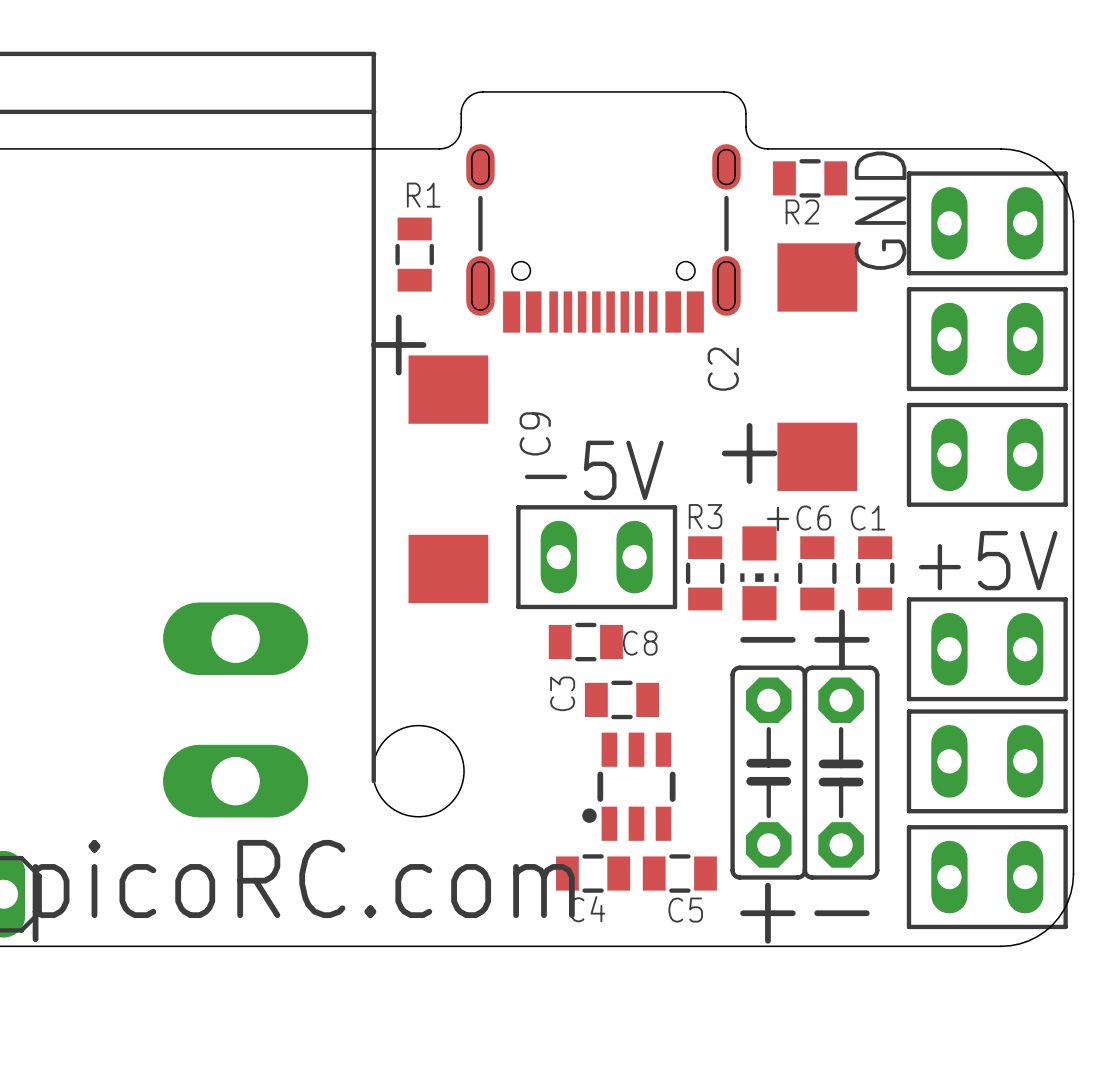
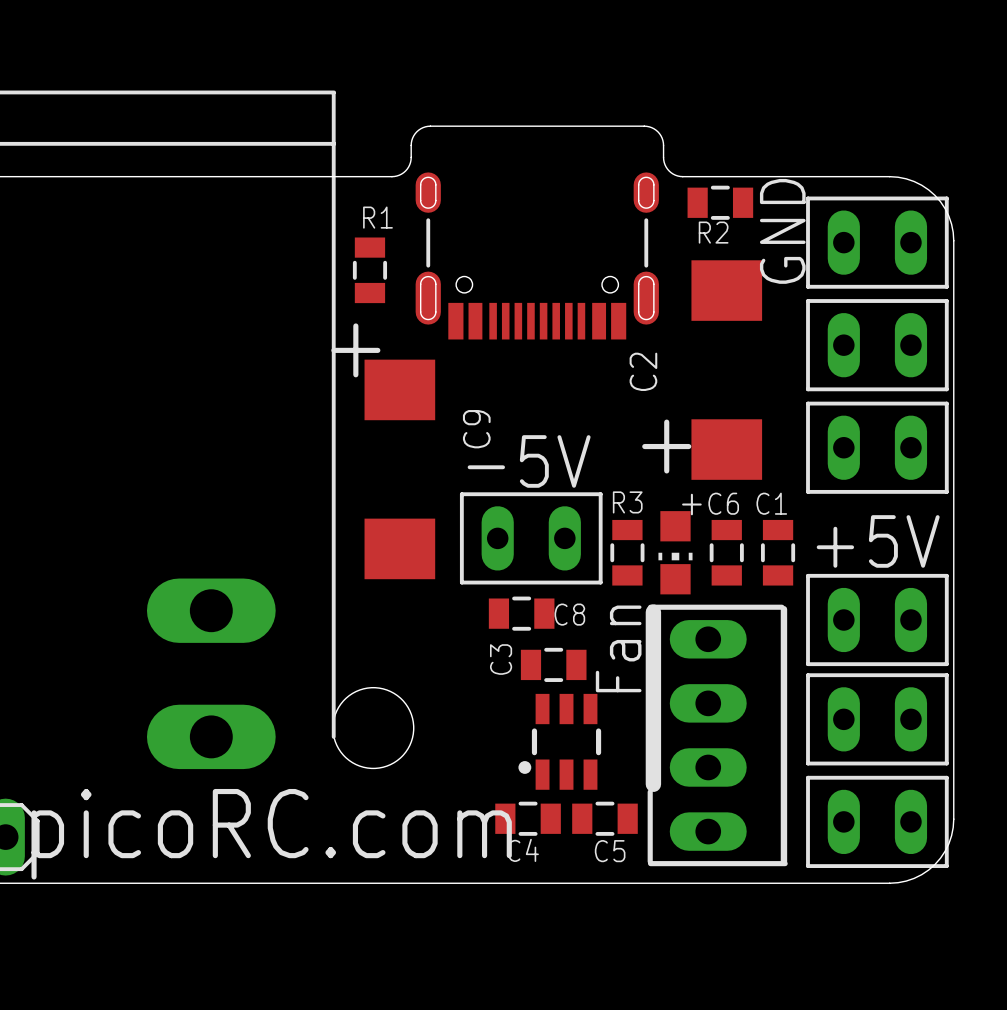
text: - (767, 639) -> none
text: + (841, 639) -> none
text: none -> Fan (618, 648)
part: (768, 772) -> none
part: (841, 772) -> none
part: none -> (716, 735)
text: + (767, 913) -> none
text: - (841, 913) -> none

